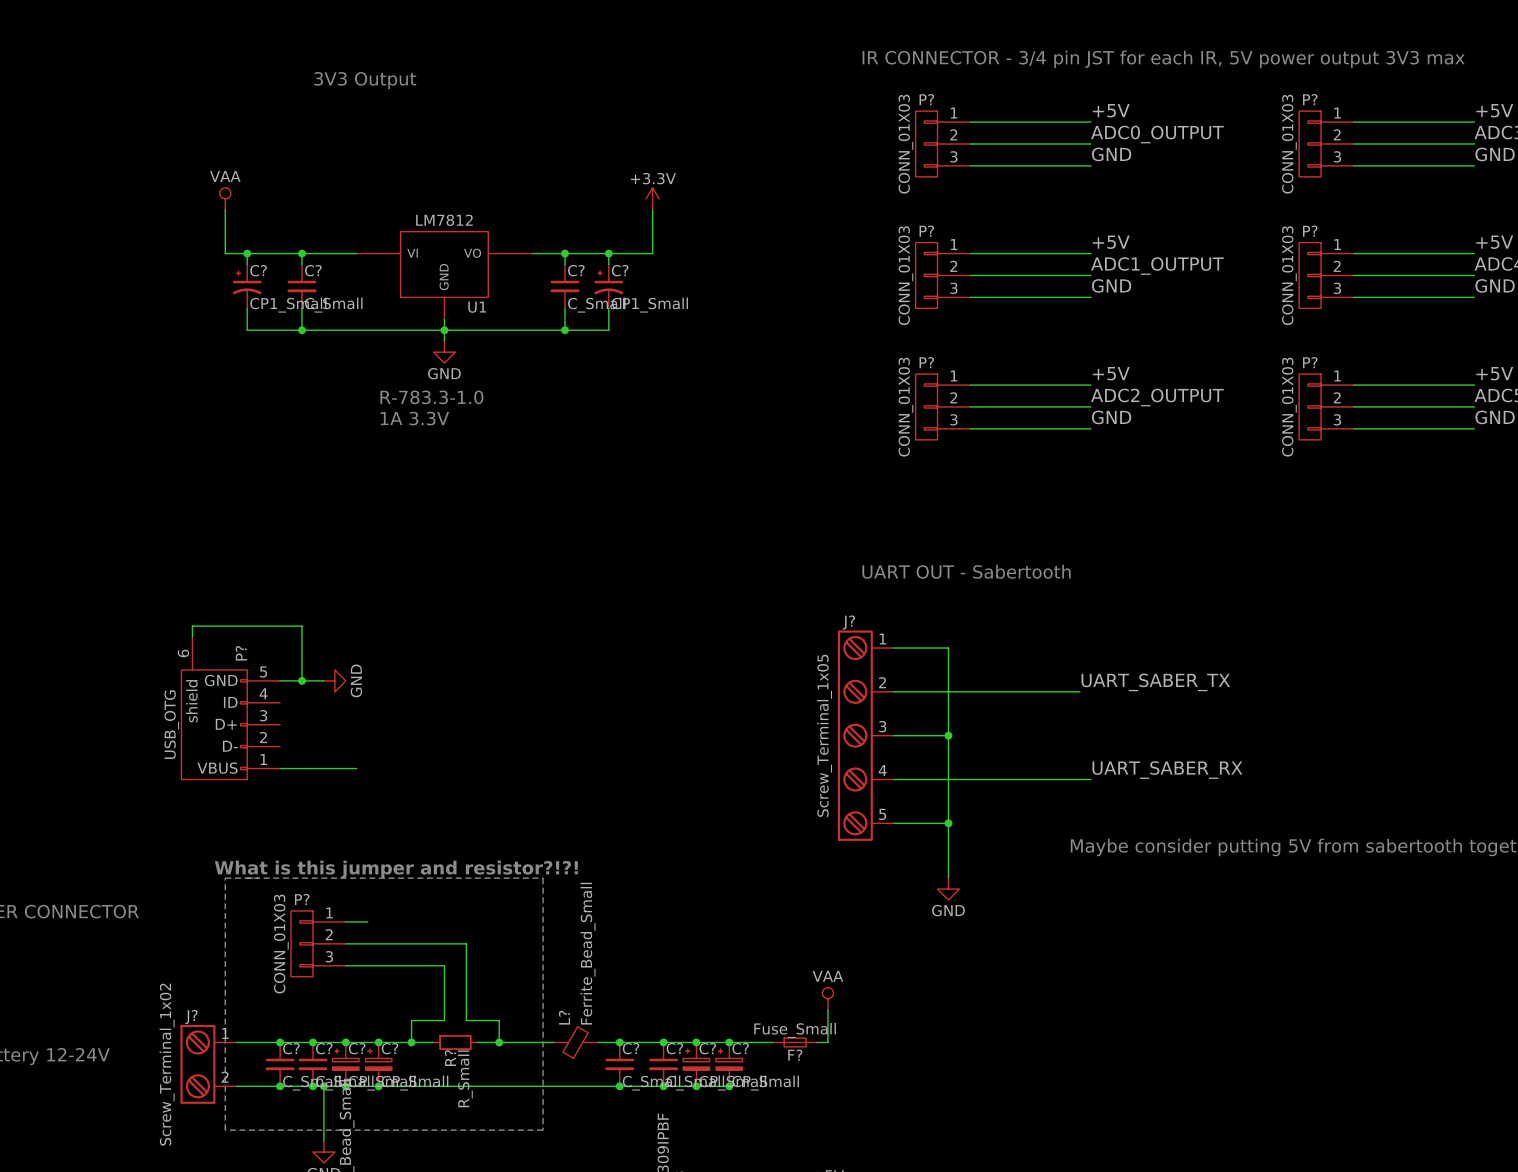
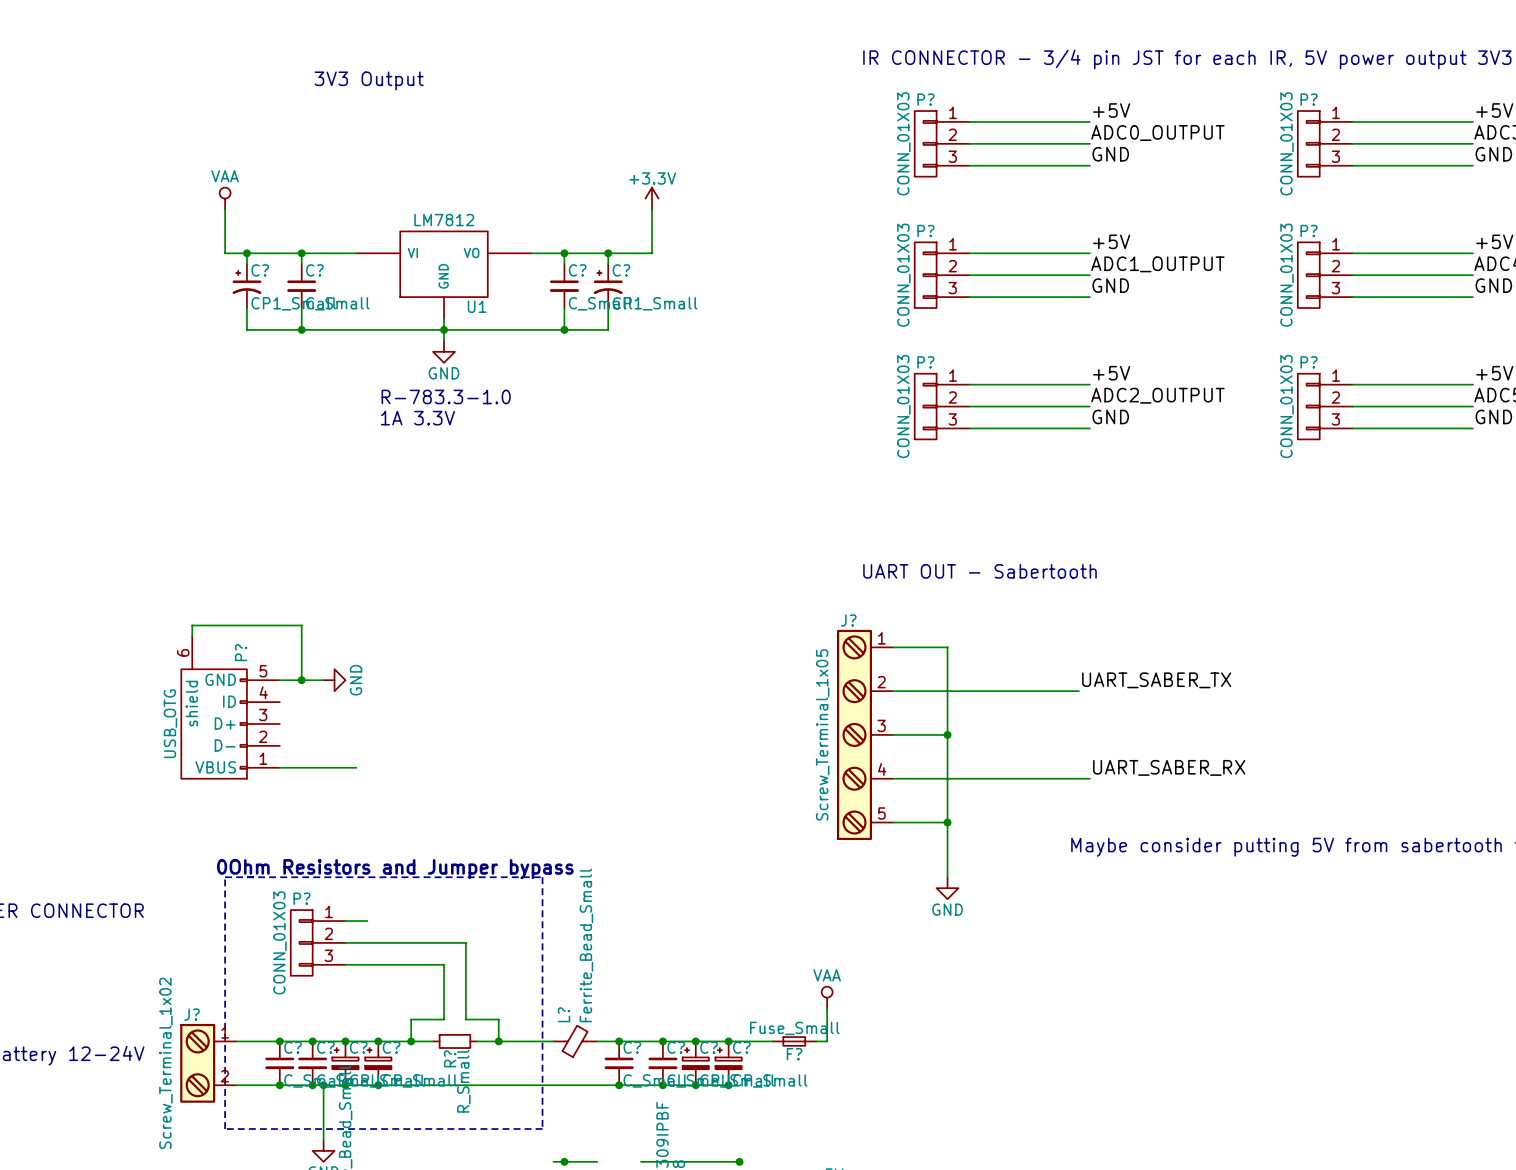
text: What is this jumper and resistor?!?! (396, 869) -> 0Ohm Resistors and Jumper bypass (395, 869)
wire: none -> (553, 1161) (597, 1161)
junction: none -> (564, 1161)
wire: none -> (641, 1161) (739, 1161)
junction: none -> (739, 1161)

